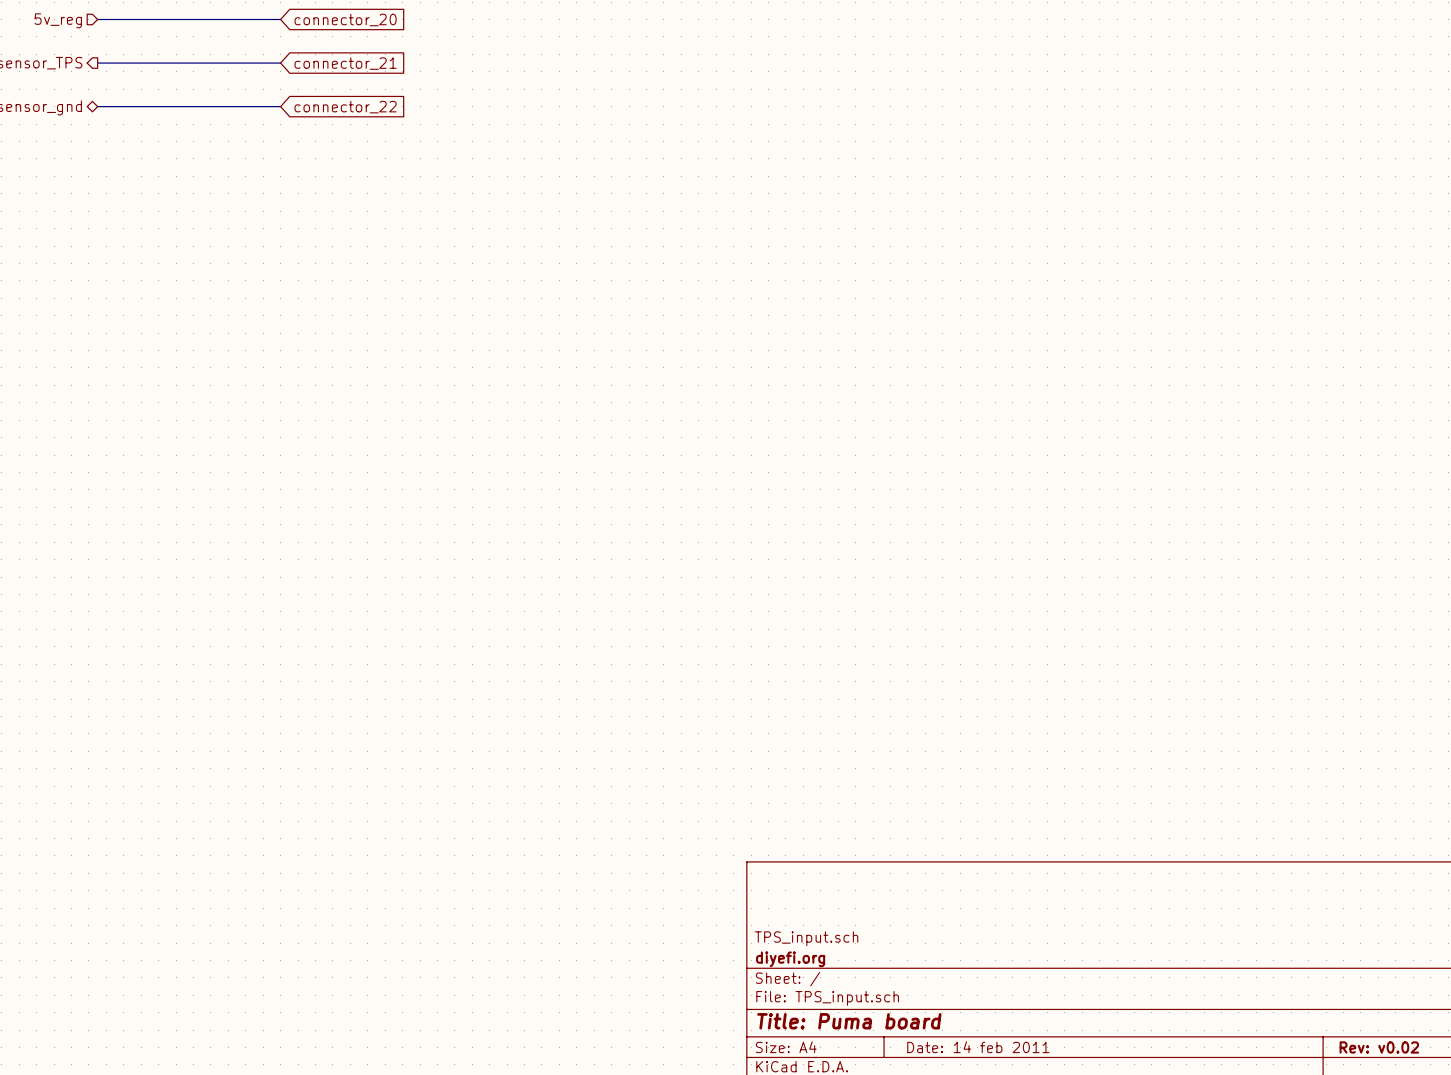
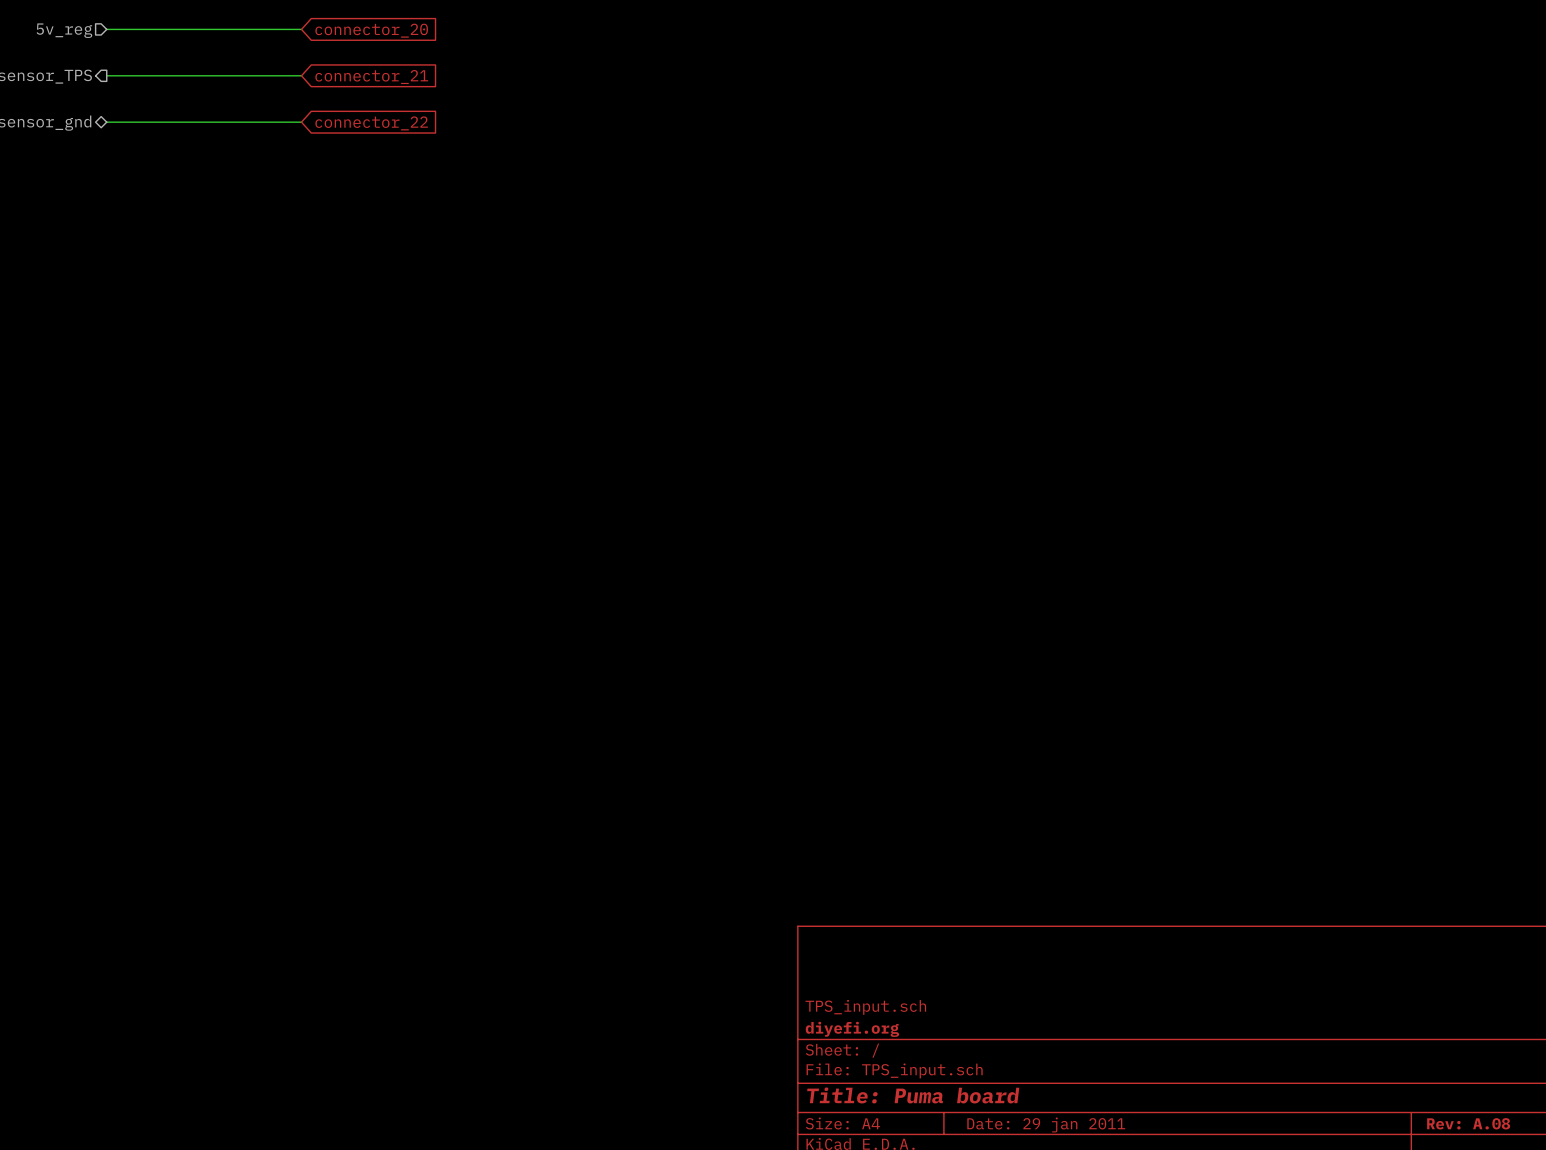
title block: Date: 14 feb 2011 (978, 1047) -> Date: 29 jan 2011 (1046, 1124)
title block: Rev: v0.02 (1379, 1047) -> Rev: A.08 (1468, 1123)

